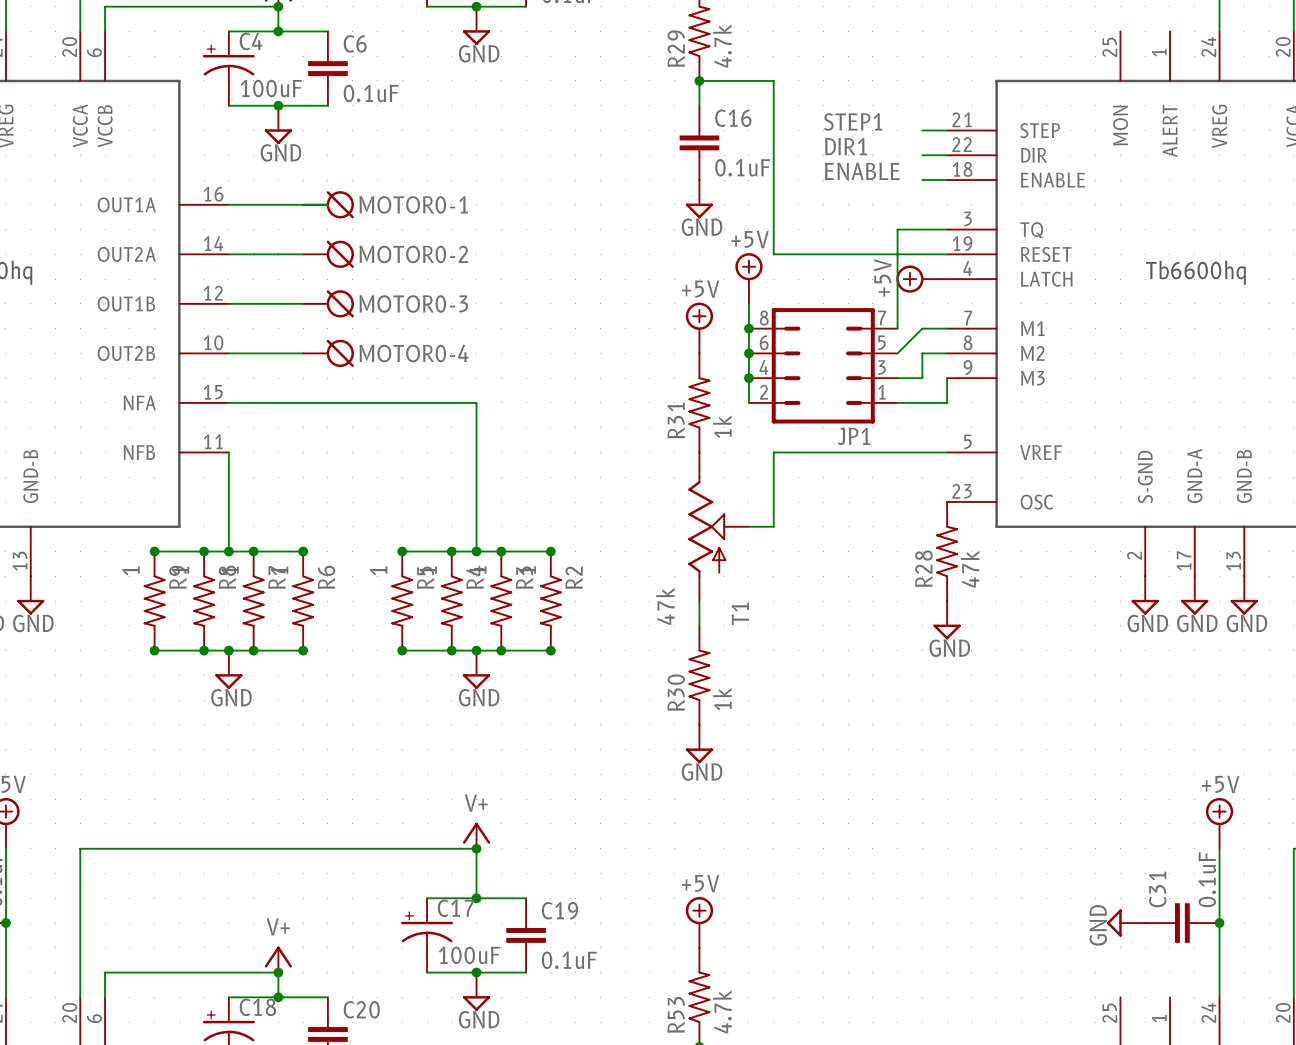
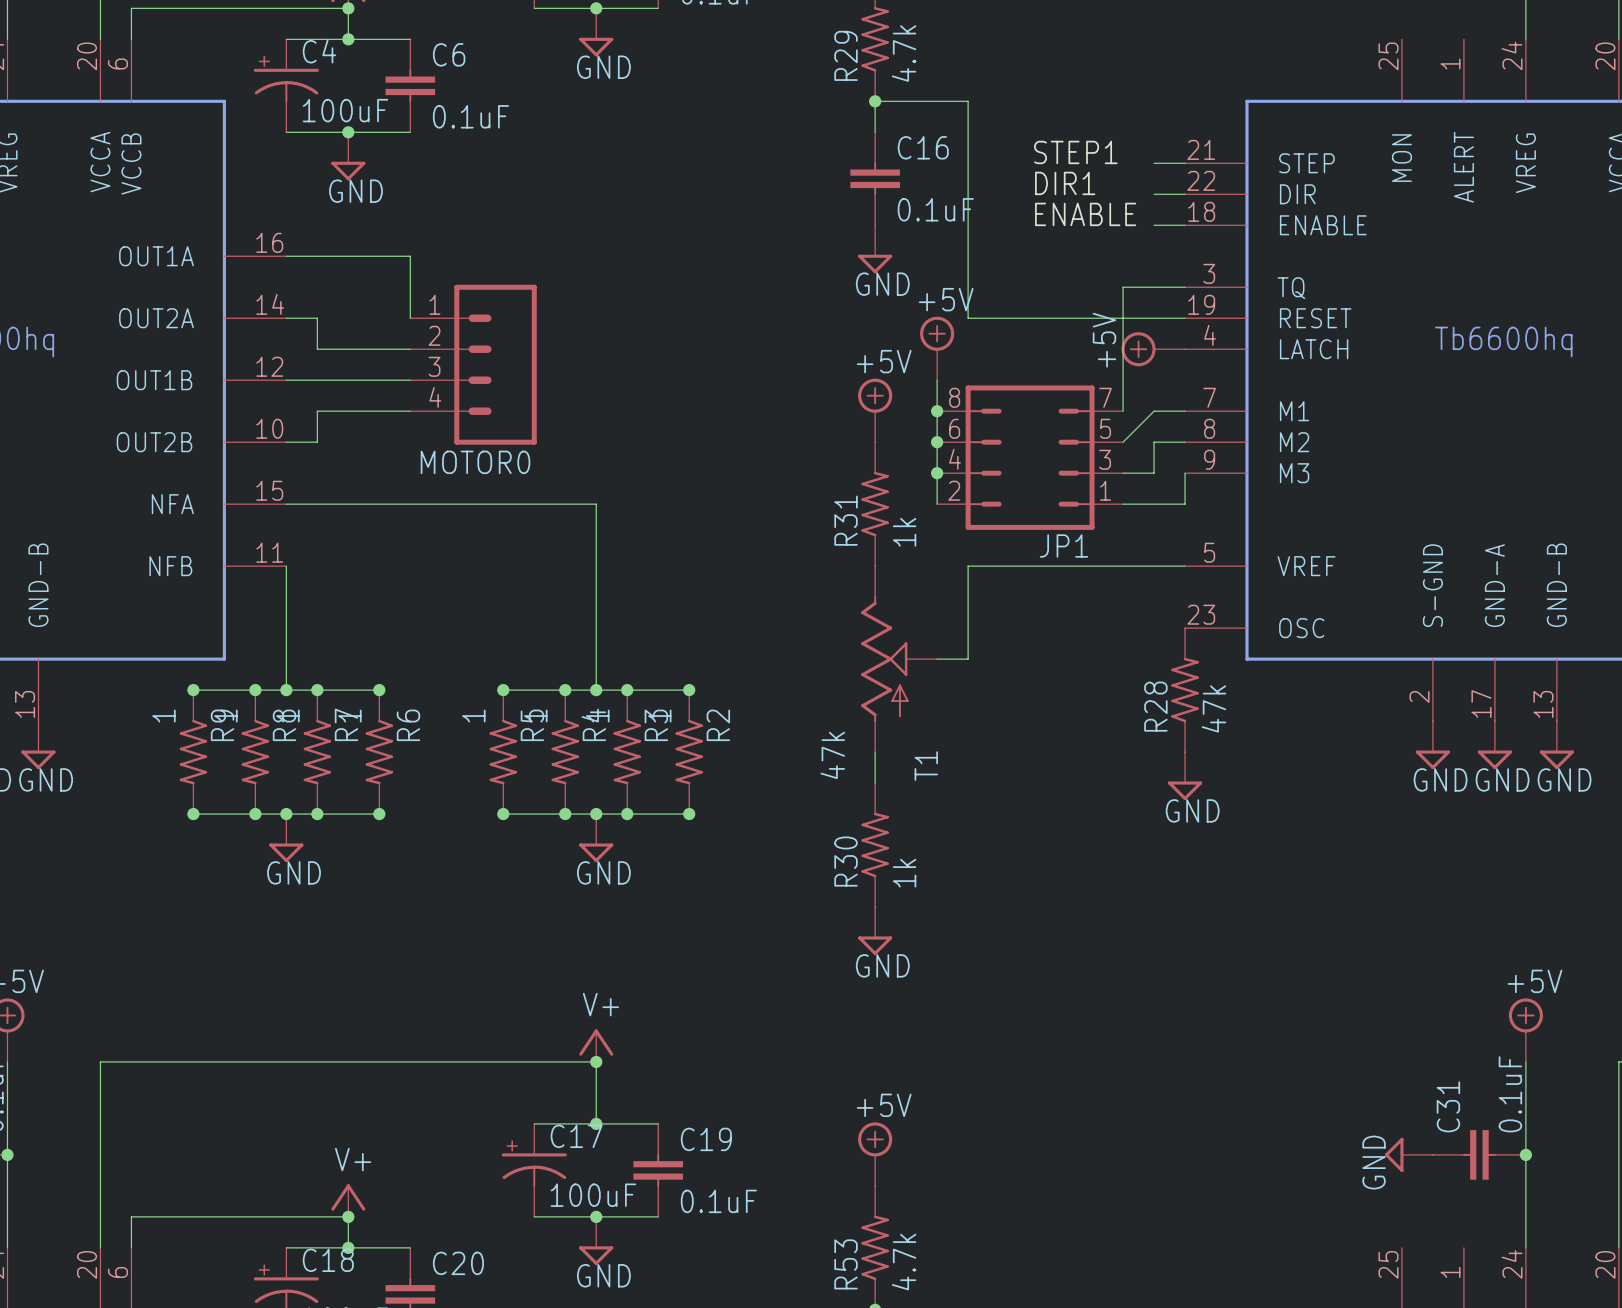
wire: none -> (410, 256) (410, 318)
MOTOR0-1: (328, 204) -> none
wire: (253, 254) (303, 254) -> (317, 318) (317, 349) (410, 349)
MOTOR0-2: (328, 254) -> none
MOTOR0: none -> (473, 364)
MOTOR0-3: (328, 303) -> none
wire: (253, 353) (303, 353) -> (317, 442) (317, 411) (410, 411)
MOTOR0-4: (328, 353) -> none

